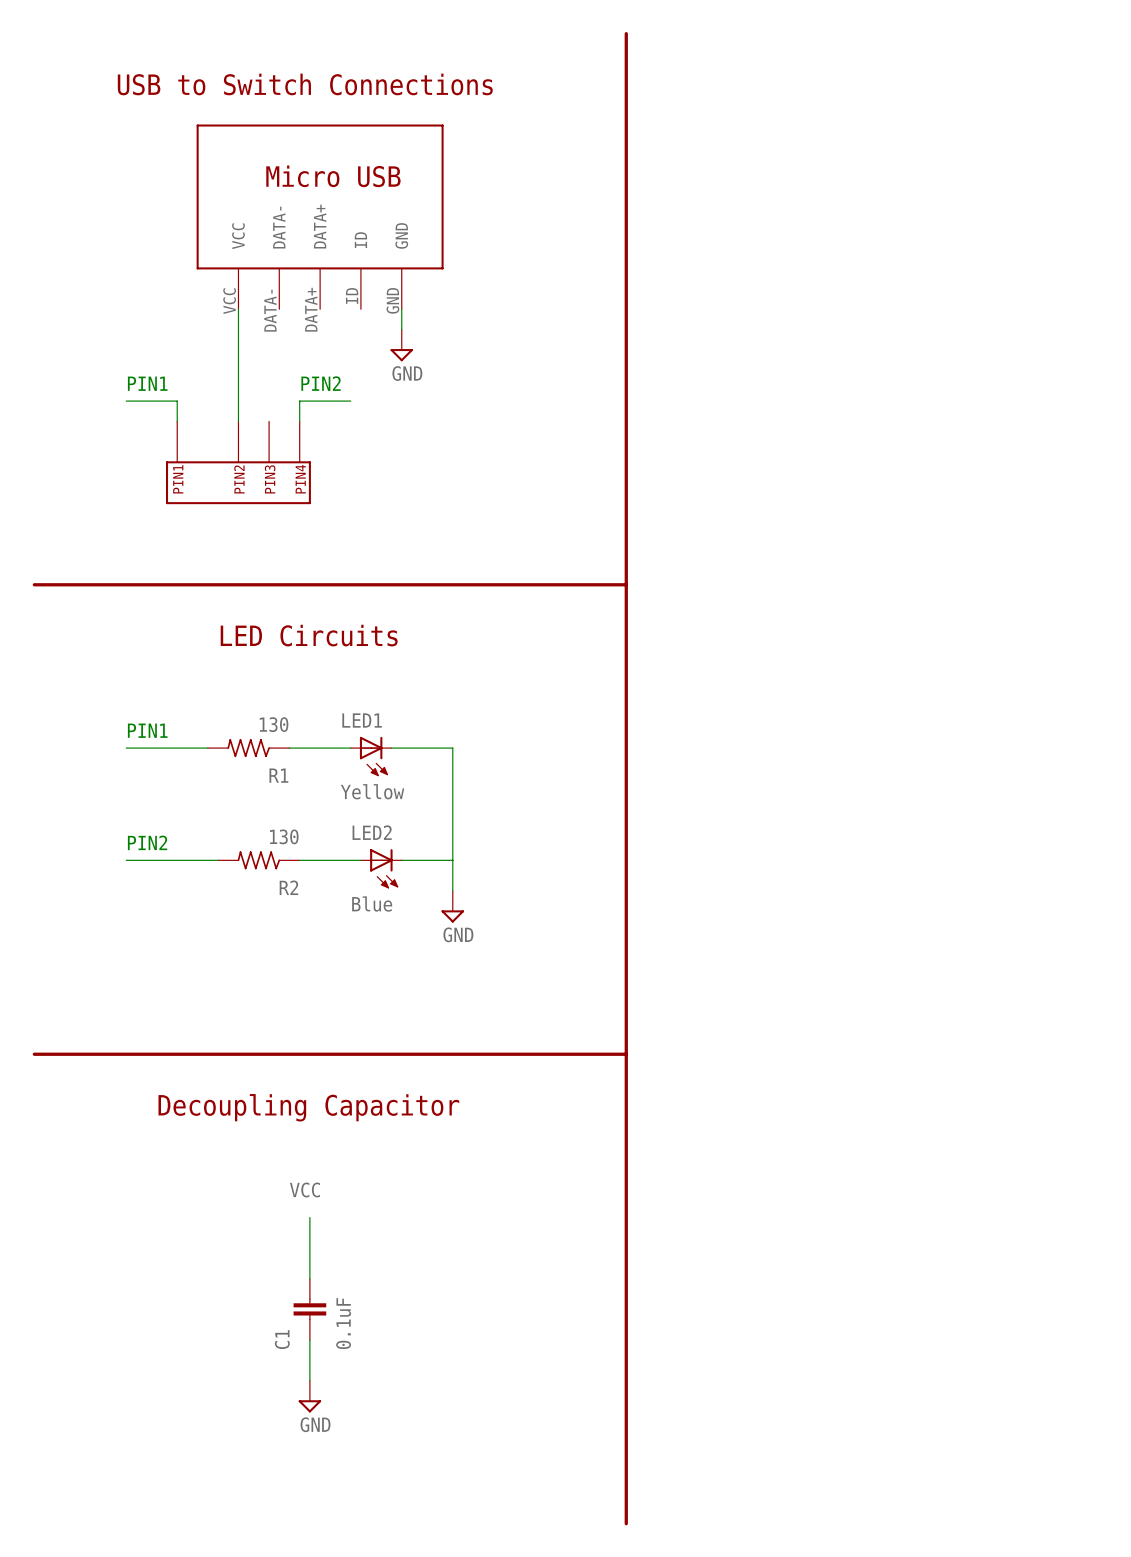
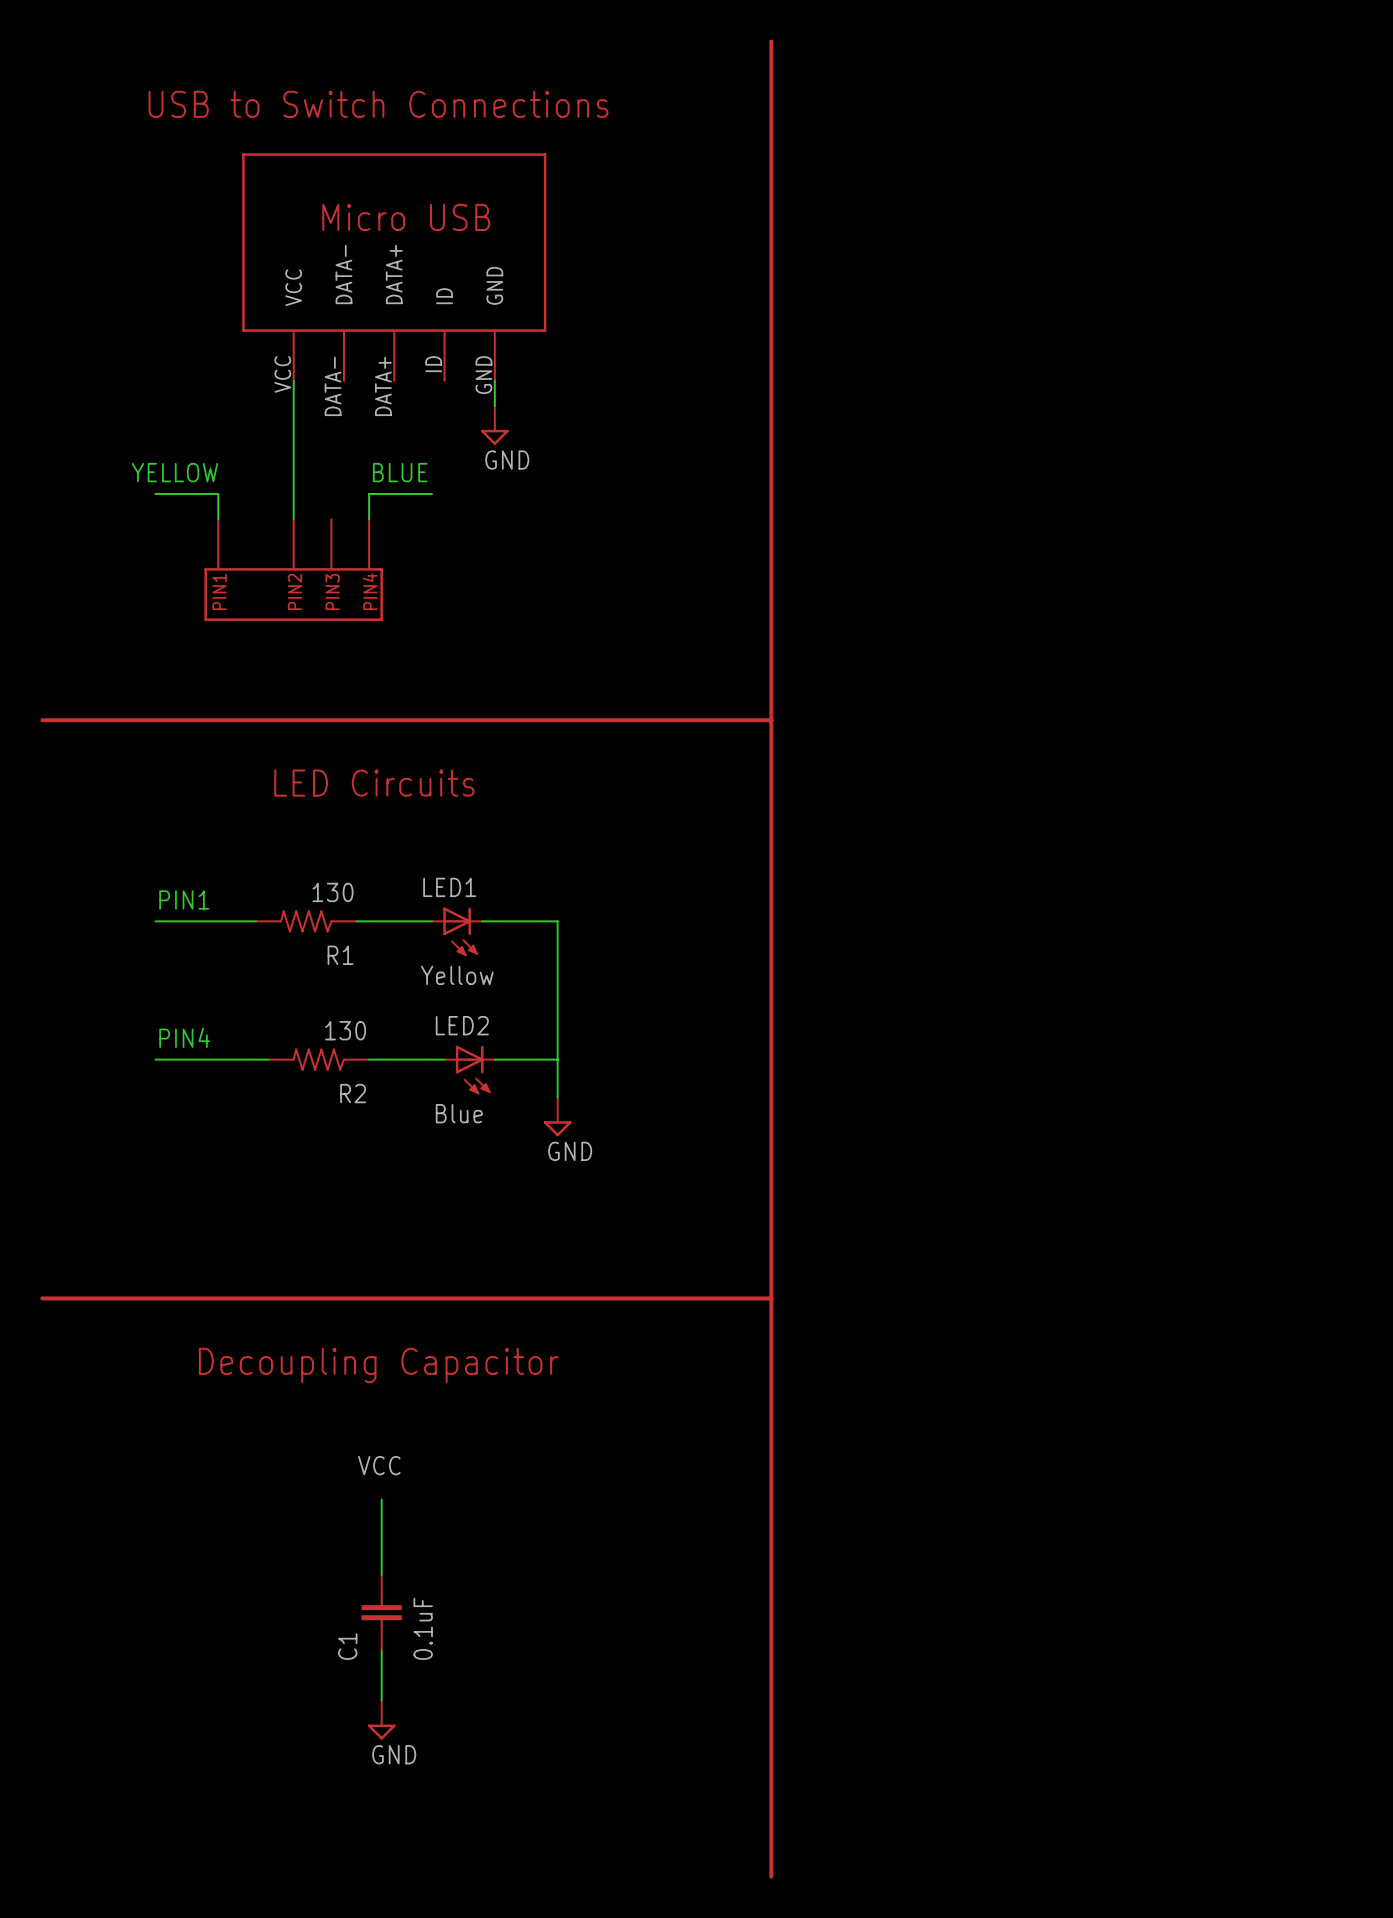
text: none -> YELLOW (174, 472)
text: PIN1 (147, 383) -> none
text: PIN2 (321, 383) -> BLUE (400, 472)
text: PIN2 (147, 842) -> PIN4 (184, 1037)

